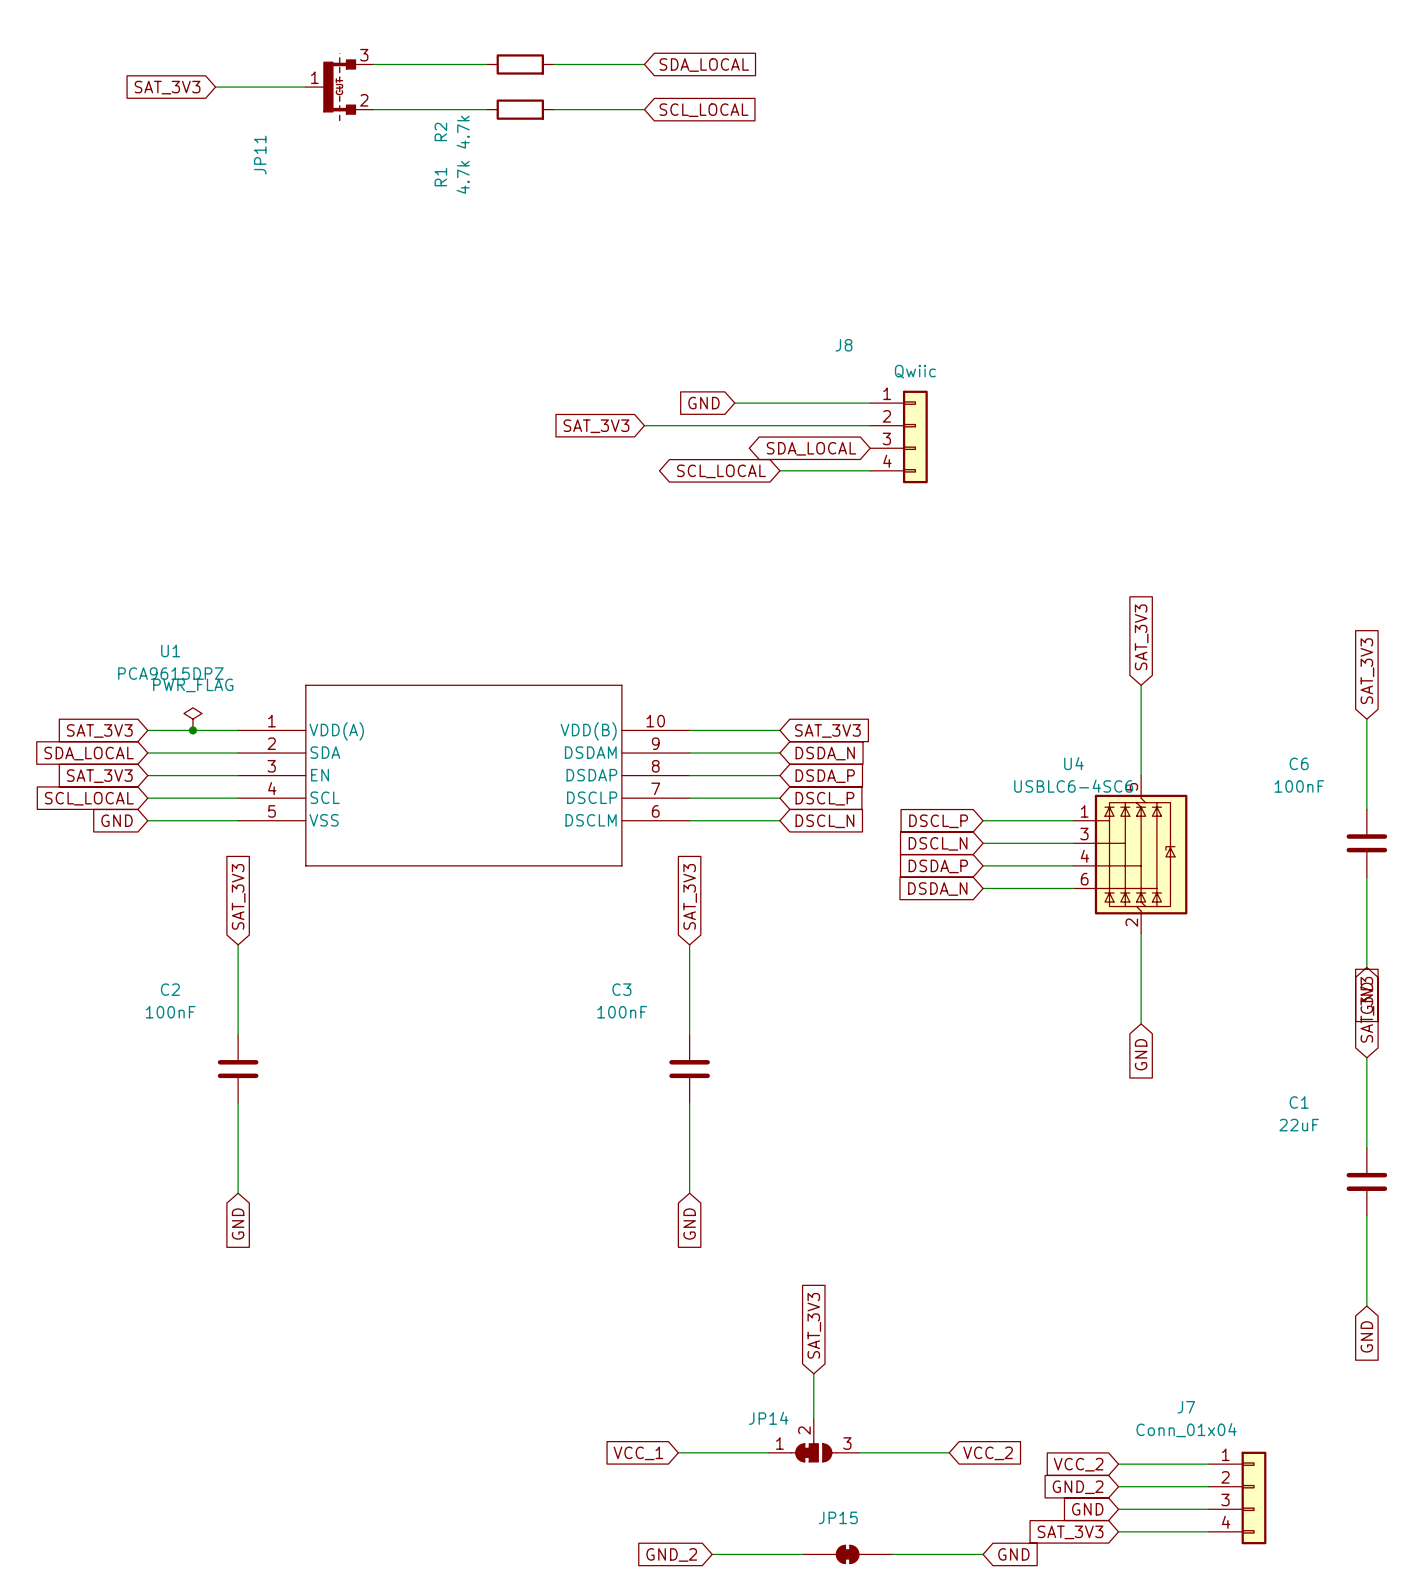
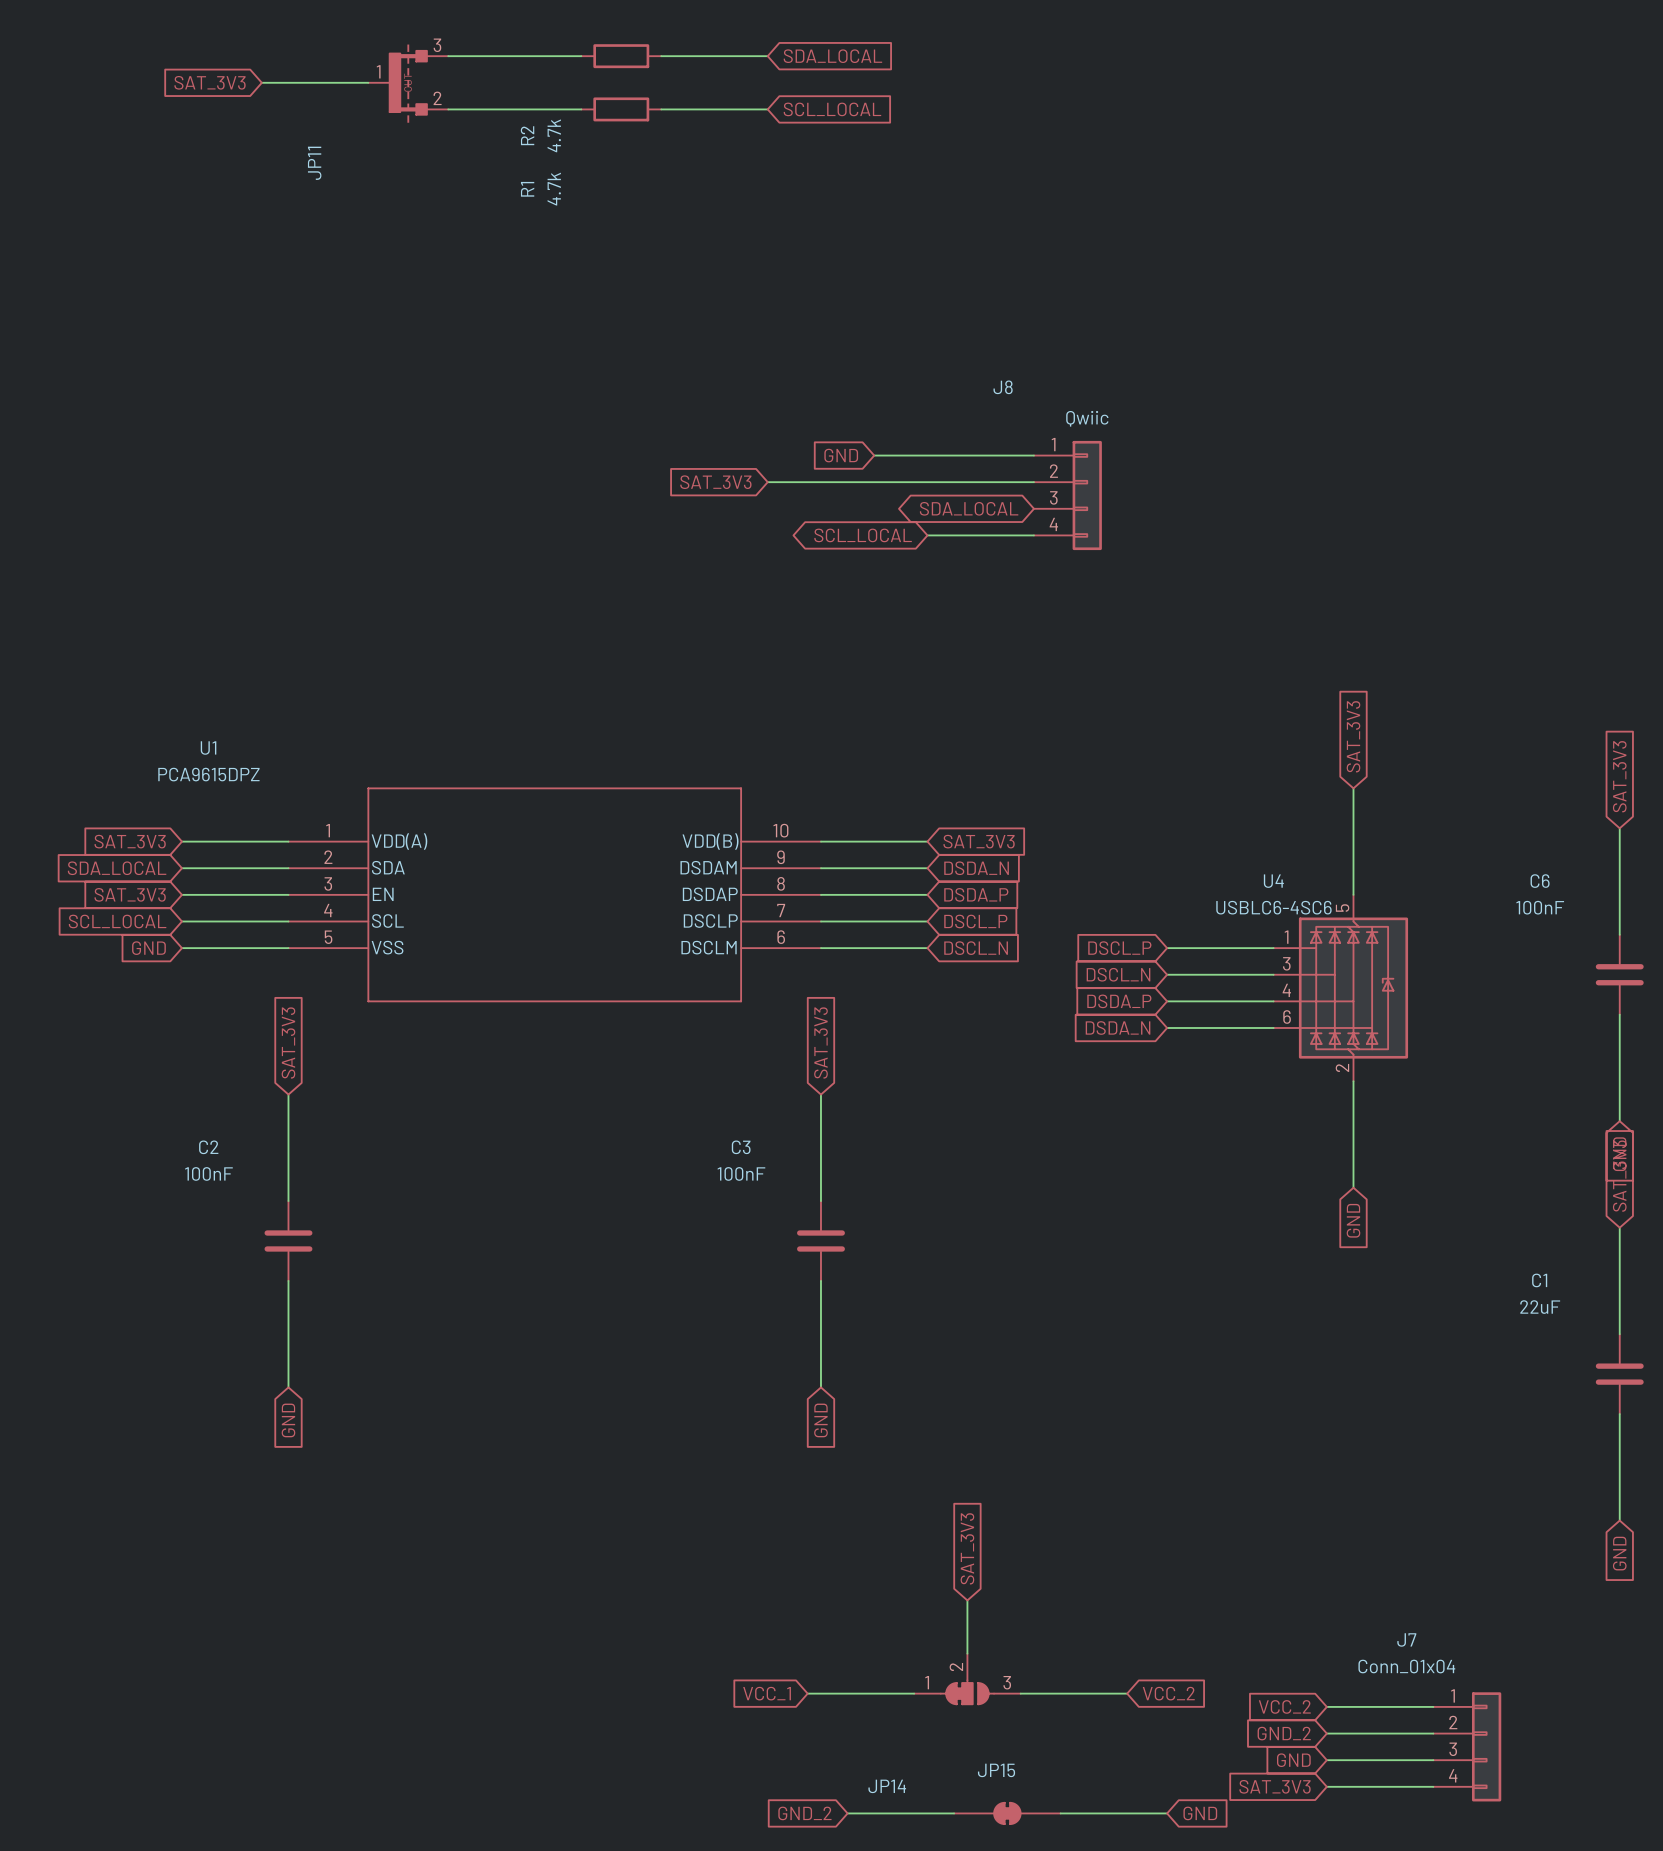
power symbol: PWR_FLAG (192, 719) -> none
junction: (192, 730) -> none
JP14 name position: JP14 (768, 1418) -> JP14 (887, 1786)

